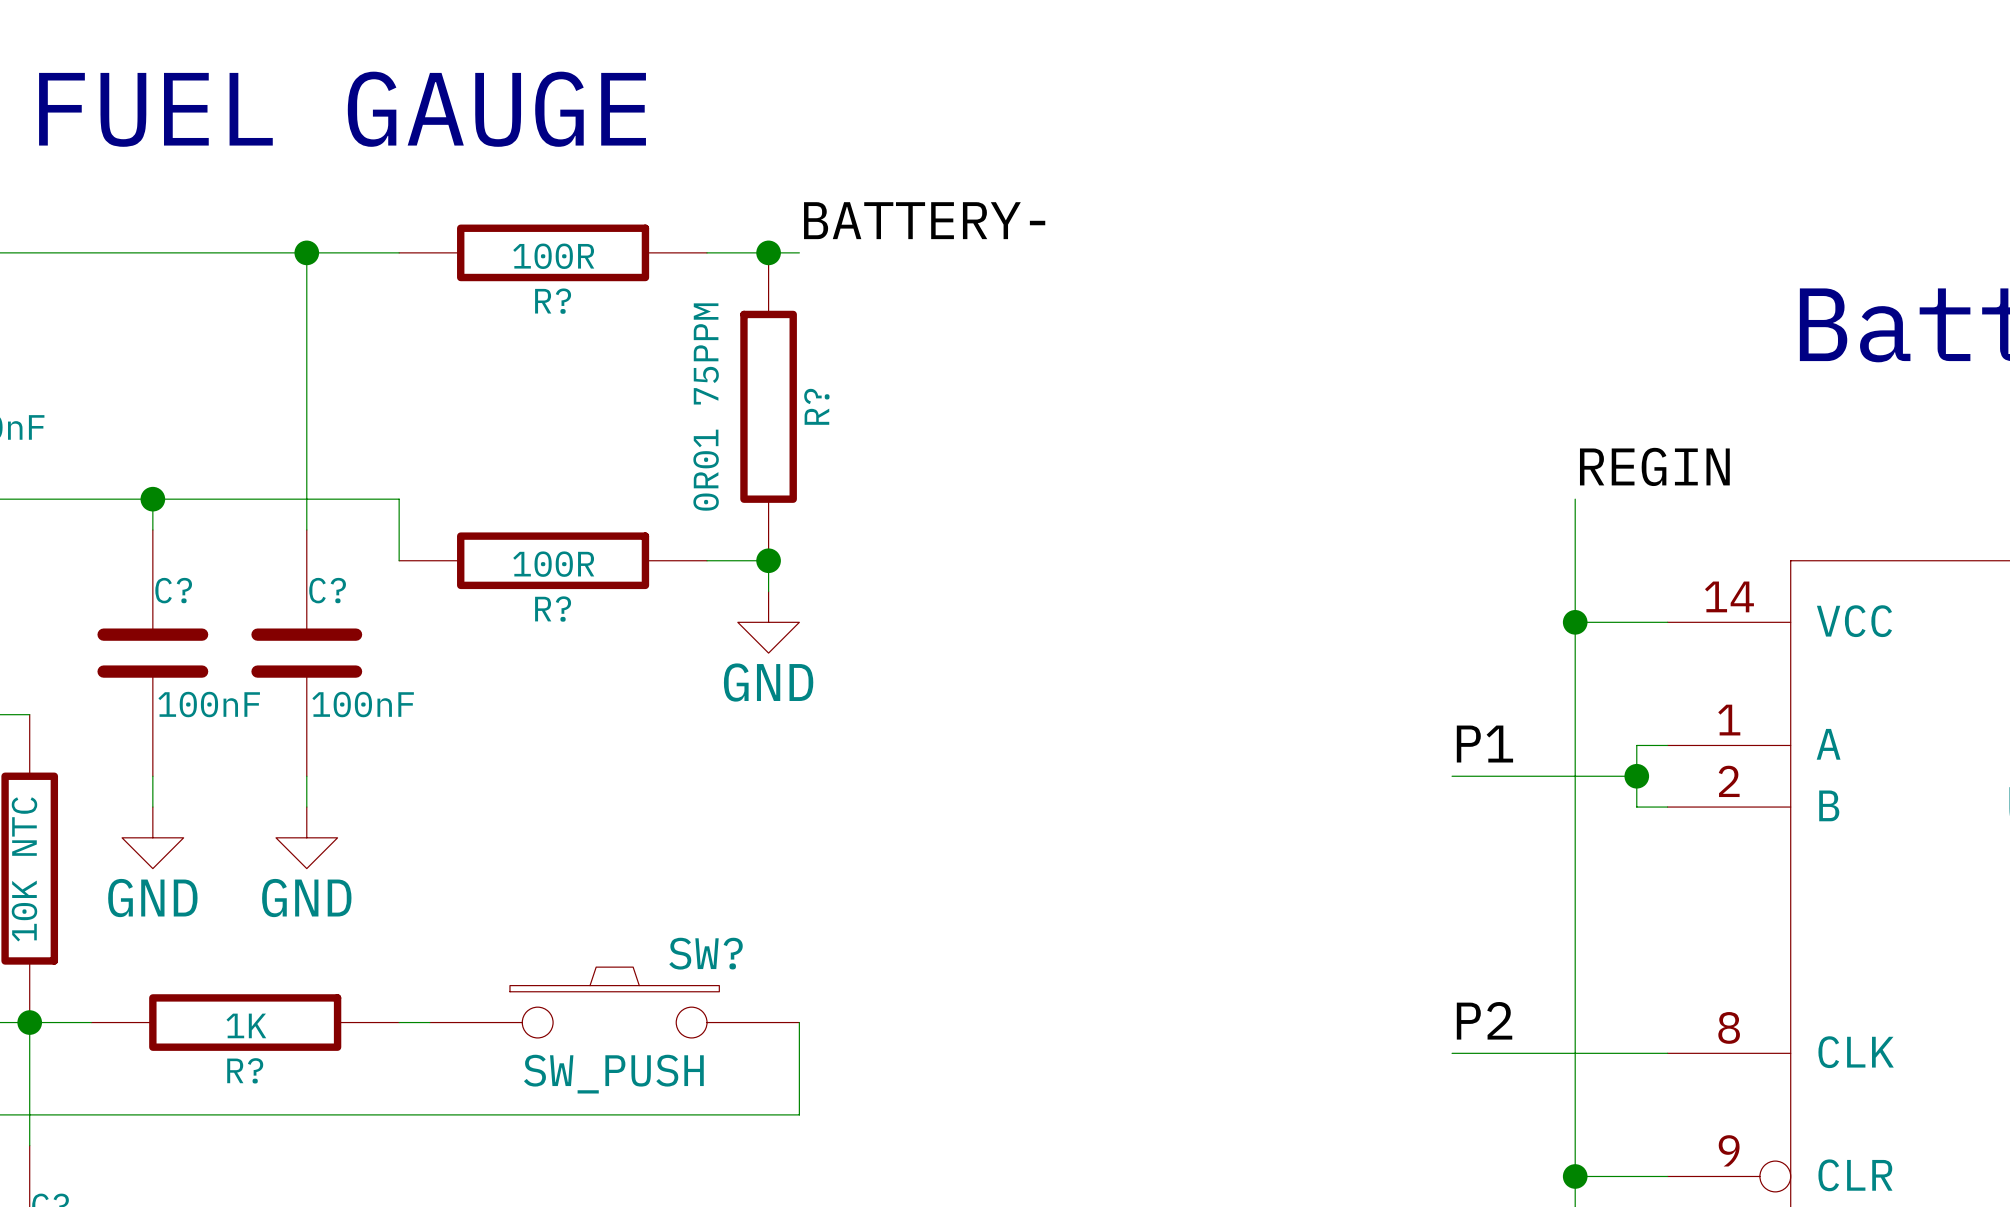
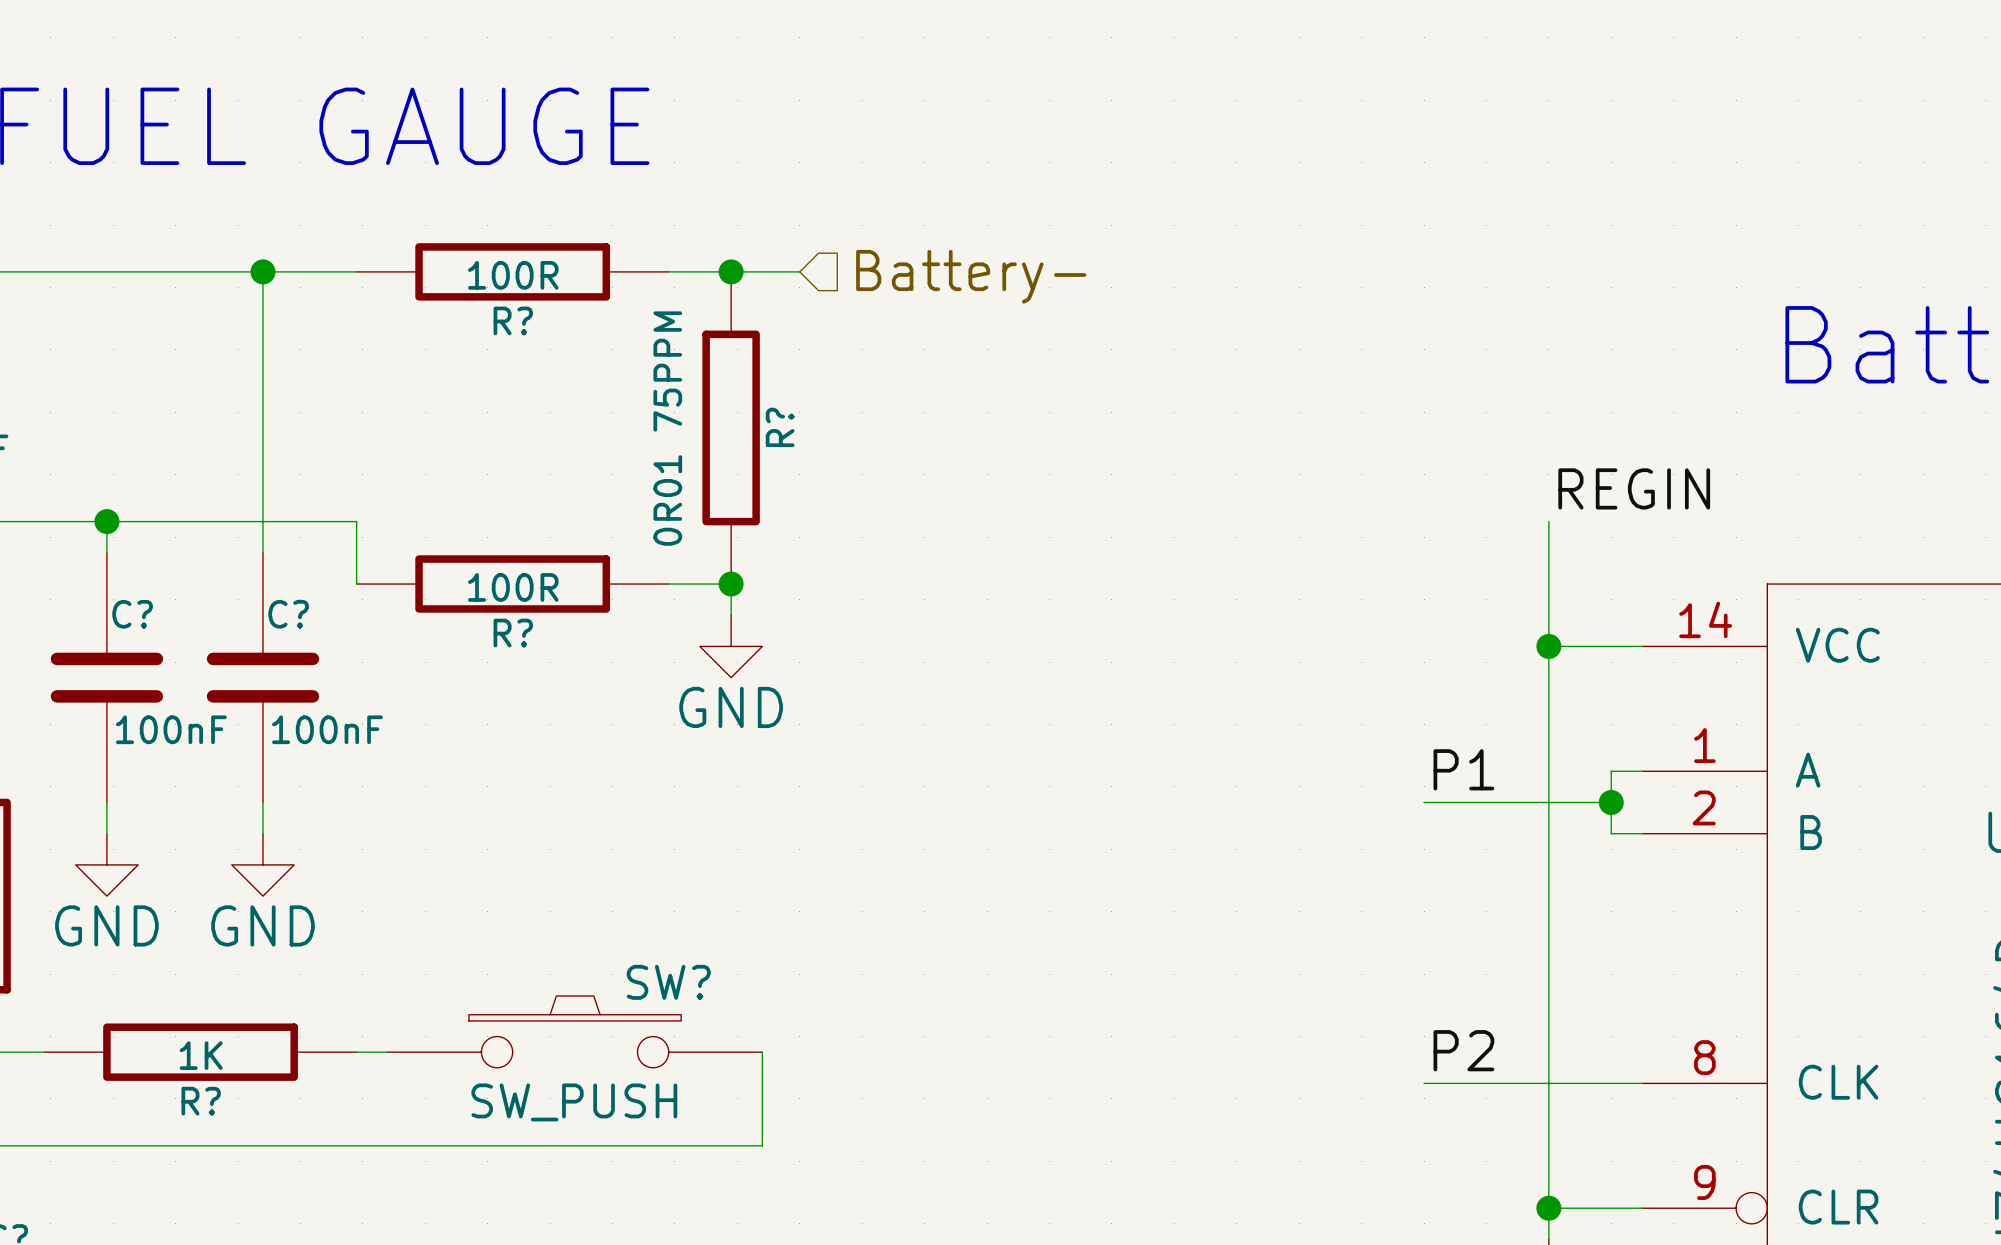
label: BATTERY- (924, 220) -> none
wire: none -> (762, 271) (799, 271)
hierarchical label: none -> Battery- (971, 276)

